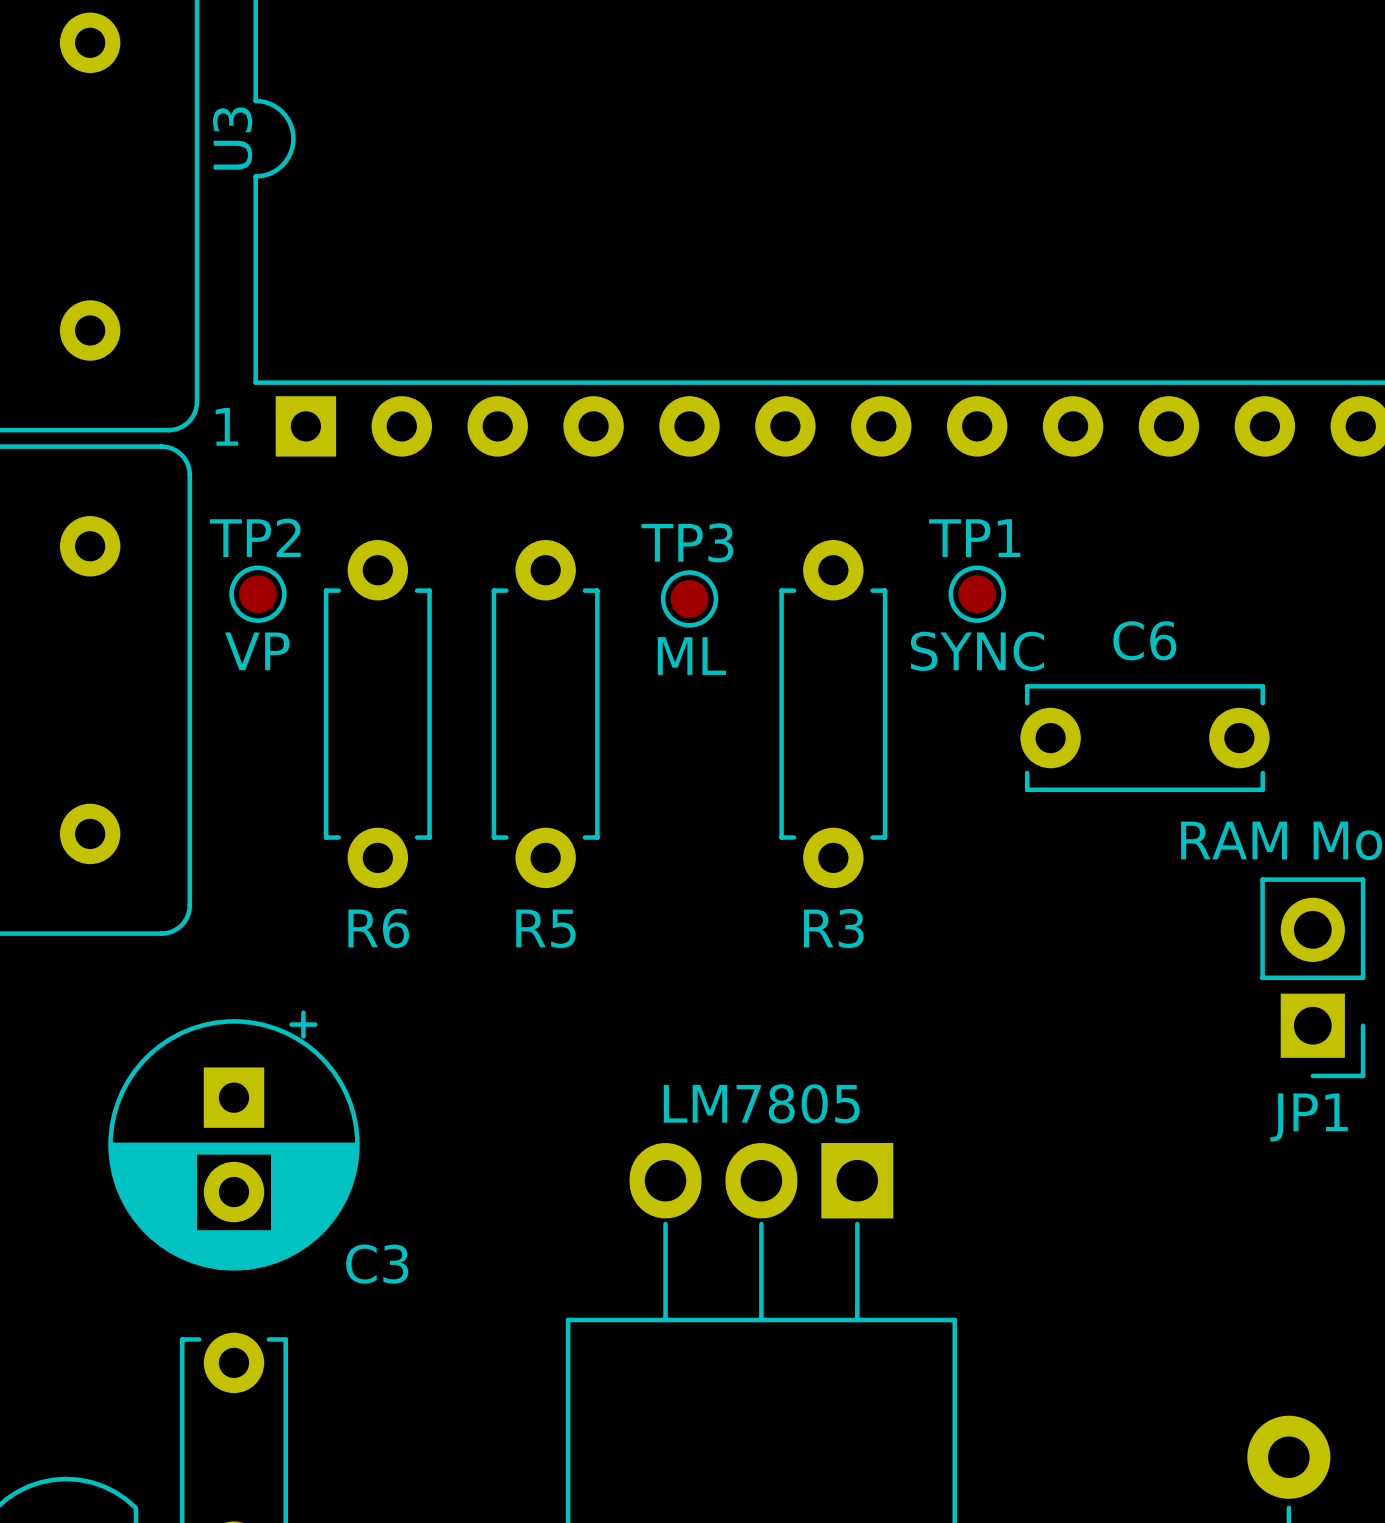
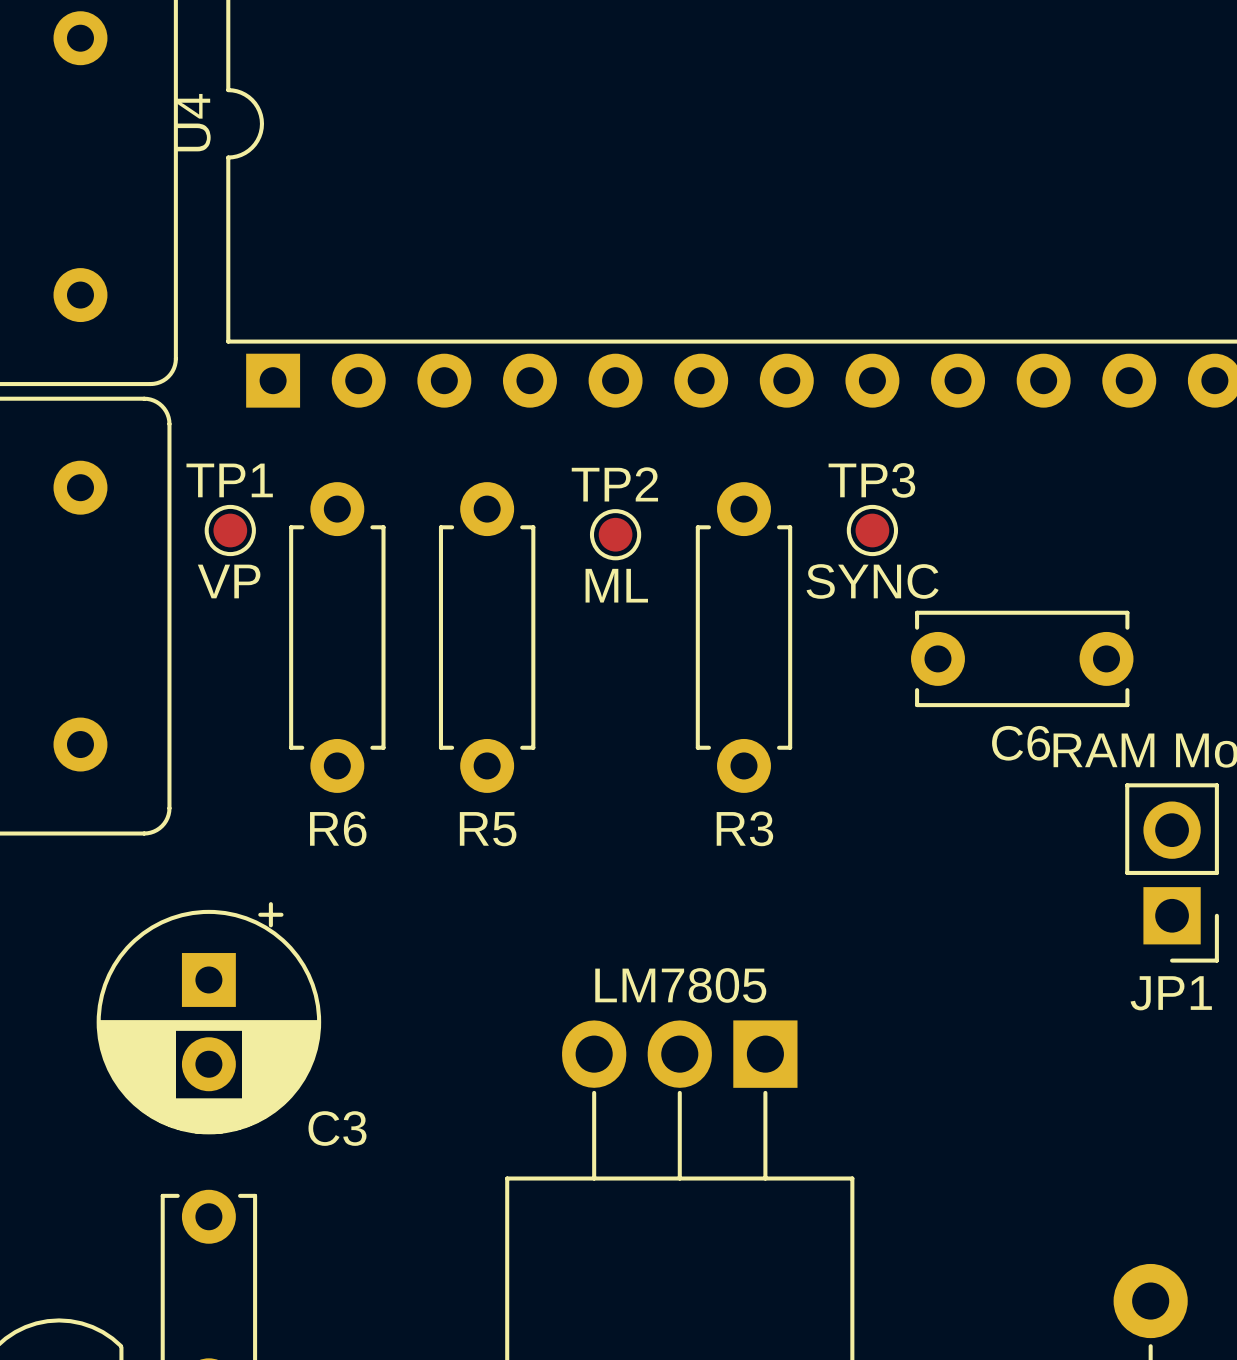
U3 name: U3 (232, 138) -> U4 (193, 122)
text: 1 (226, 426) -> none
TP2 name: TP2 (255, 537) -> TP1 (229, 480)
TP1 name: TP1 (974, 538) -> TP3 (871, 480)
TP3 name: TP3 (687, 542) -> TP2 (614, 484)
C6 name position: C6 (1144, 640) -> C6 (1021, 743)

